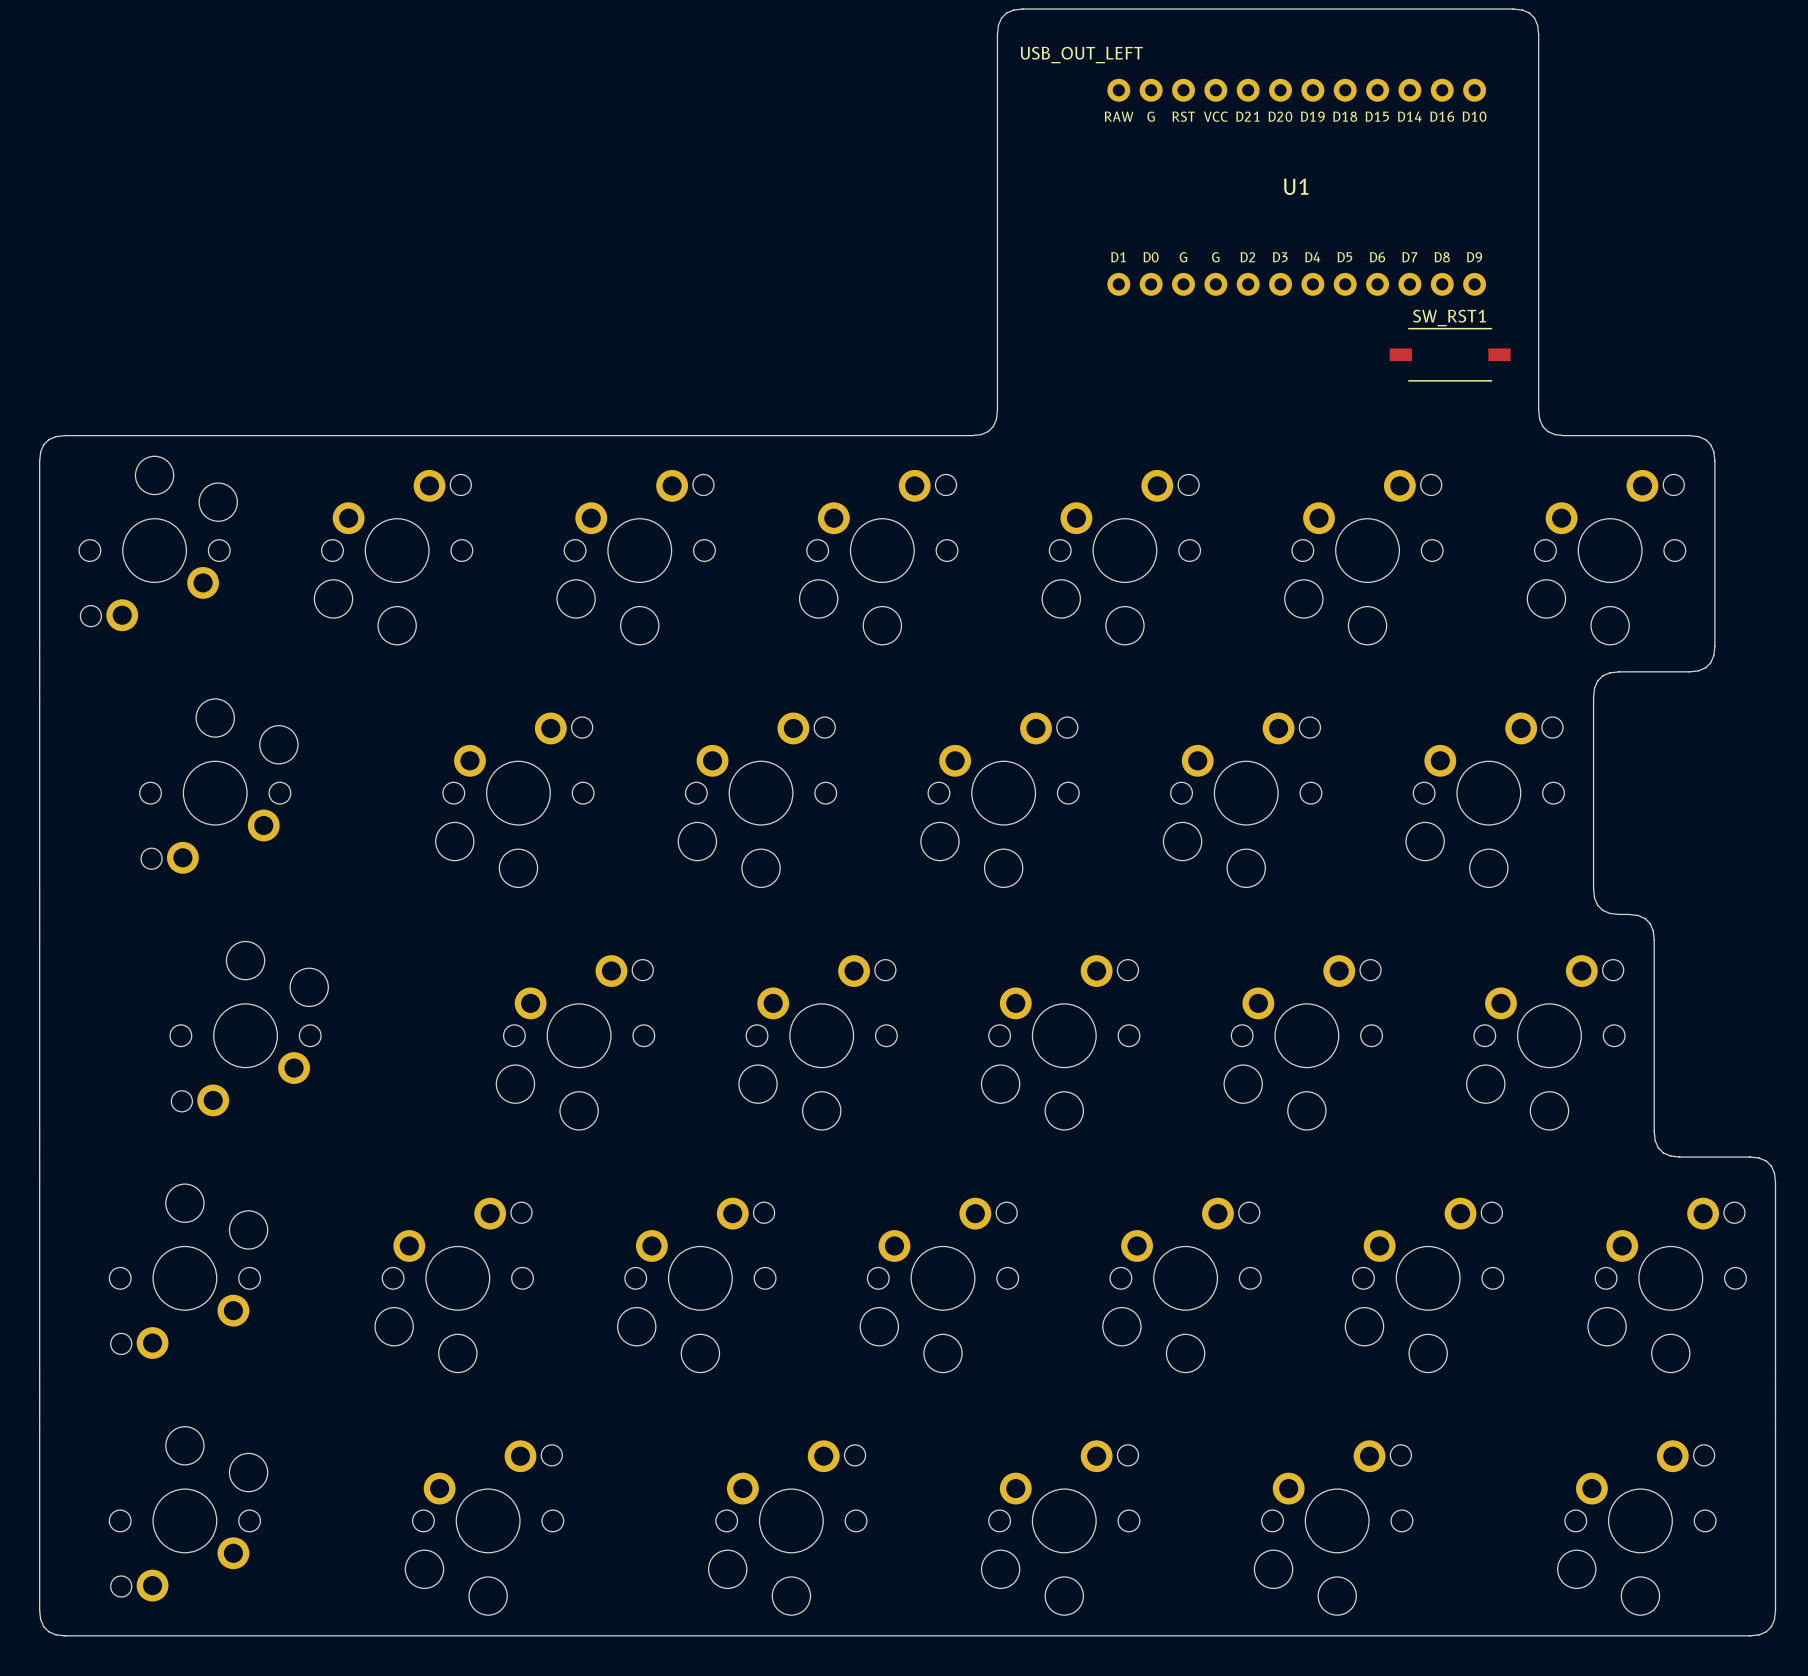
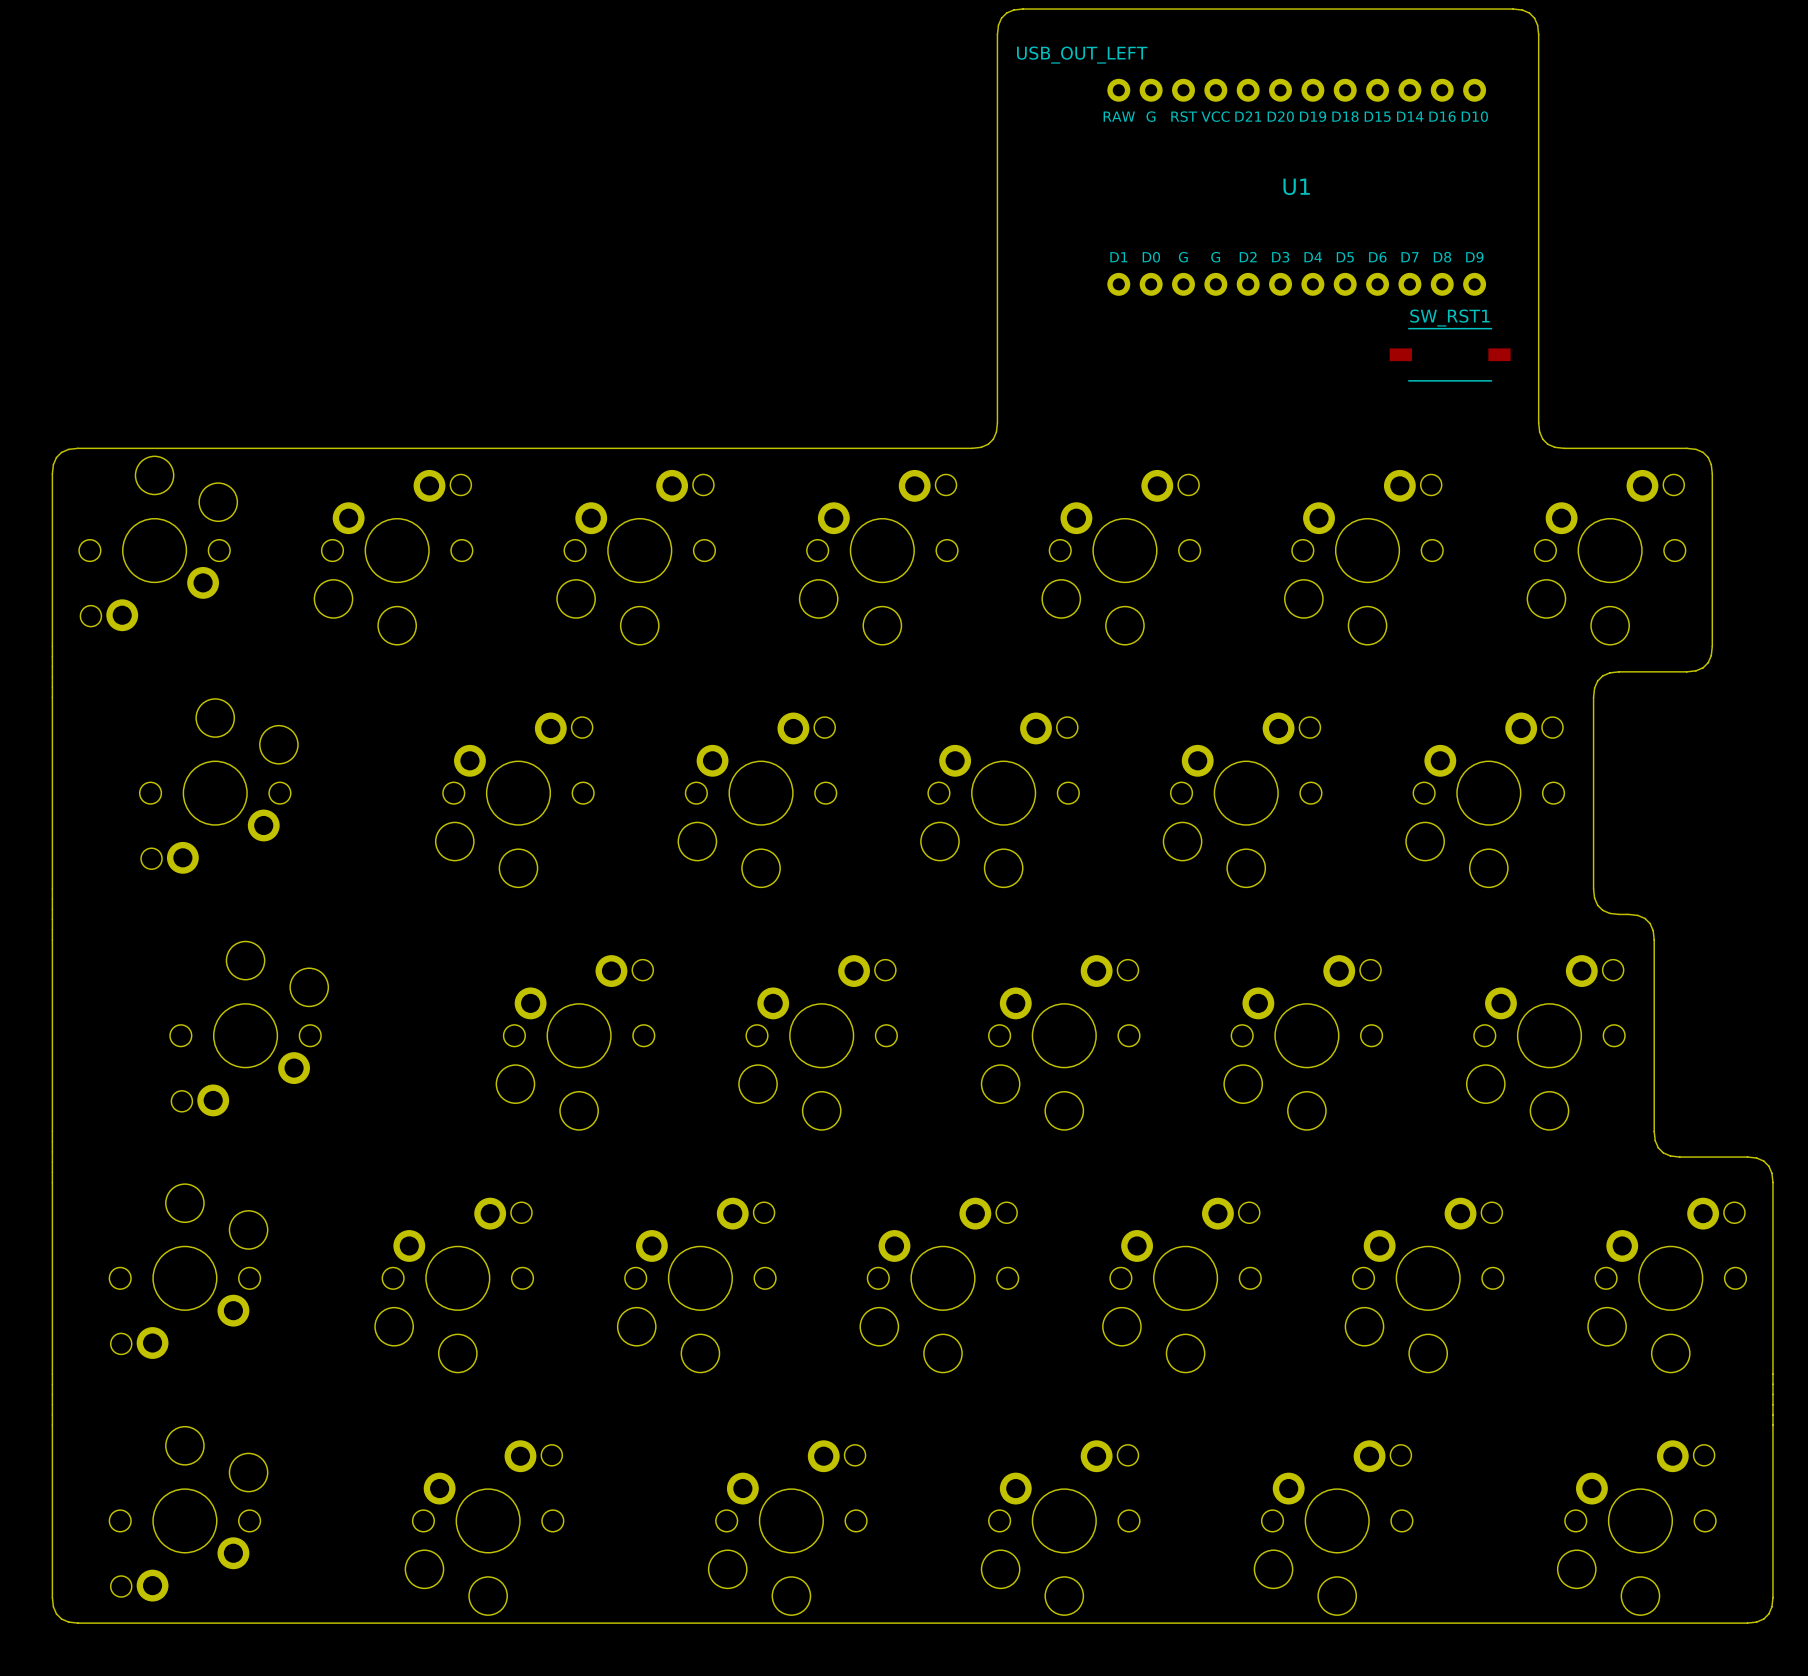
board edge: (997, 410) (993, 426) (988, 431) (971, 435) (65, 435) (48, 439) (43, 444) (39, 461) (39, 1610) (40, 1619) (48, 1631) (65, 1635) (1759, 1634) (1771, 1626) (1775, 1610) (1775, 1182) (1771, 1166) (1766, 1161) (1747, 1157) -> (997, 410) (996, 432) (993, 439) (988, 444) (971, 448) (77, 448) (61, 452) (56, 457) (52, 473) (52, 1597) (53, 1606) (61, 1619) (77, 1623) (1756, 1622) (1768, 1613) (1772, 1597) (1772, 1182) (1771, 1173) (1763, 1161) (1747, 1157)
board edge: (1538, 410) (1542, 426) (1554, 434) (1689, 435) (1698, 436) (1710, 444) (1714, 461) (1714, 646) (1713, 655) (1705, 667) (1686, 671) -> (1538, 410) (1539, 432) (1542, 439) (1554, 447) (1686, 448) (1703, 452) (1708, 457) (1712, 473) (1712, 646) (1708, 662) (1703, 667) (1686, 671)

